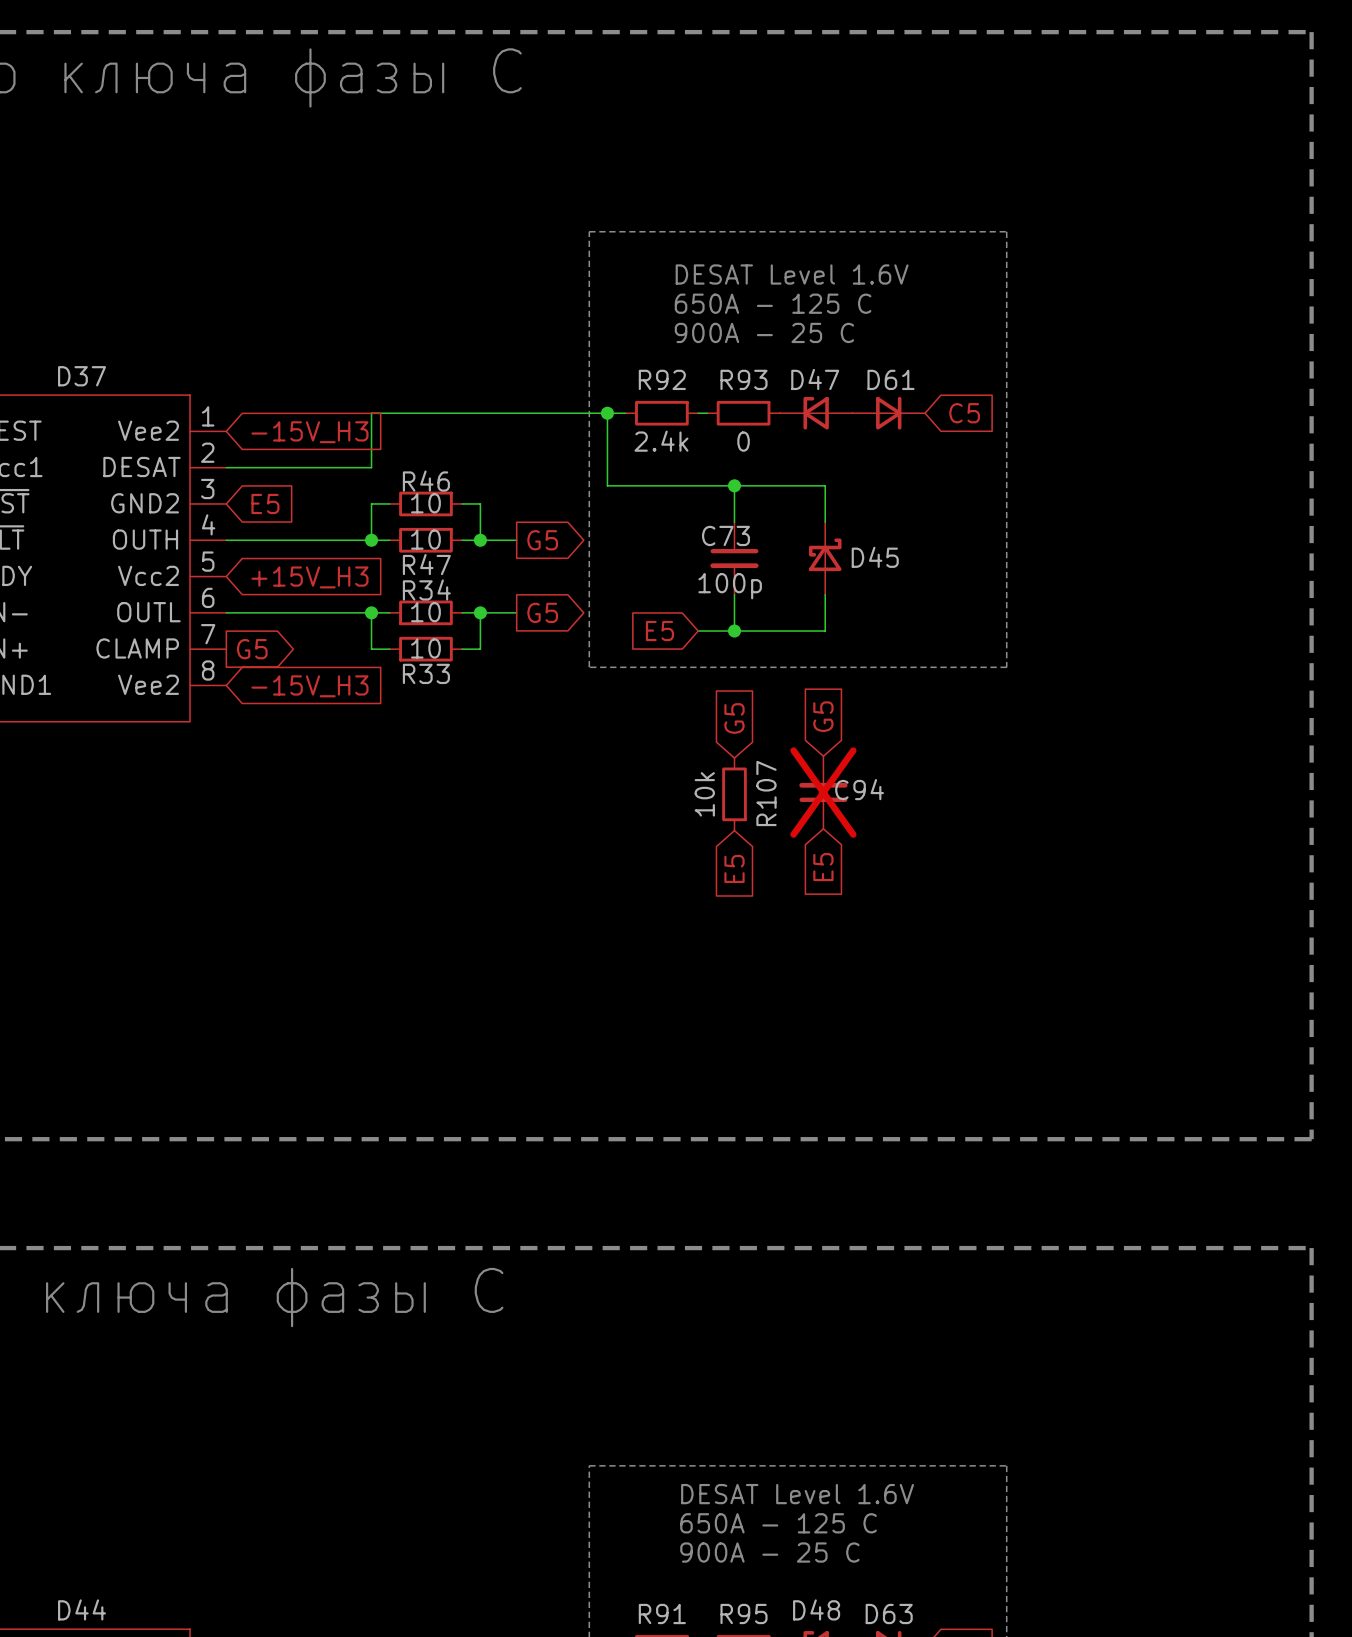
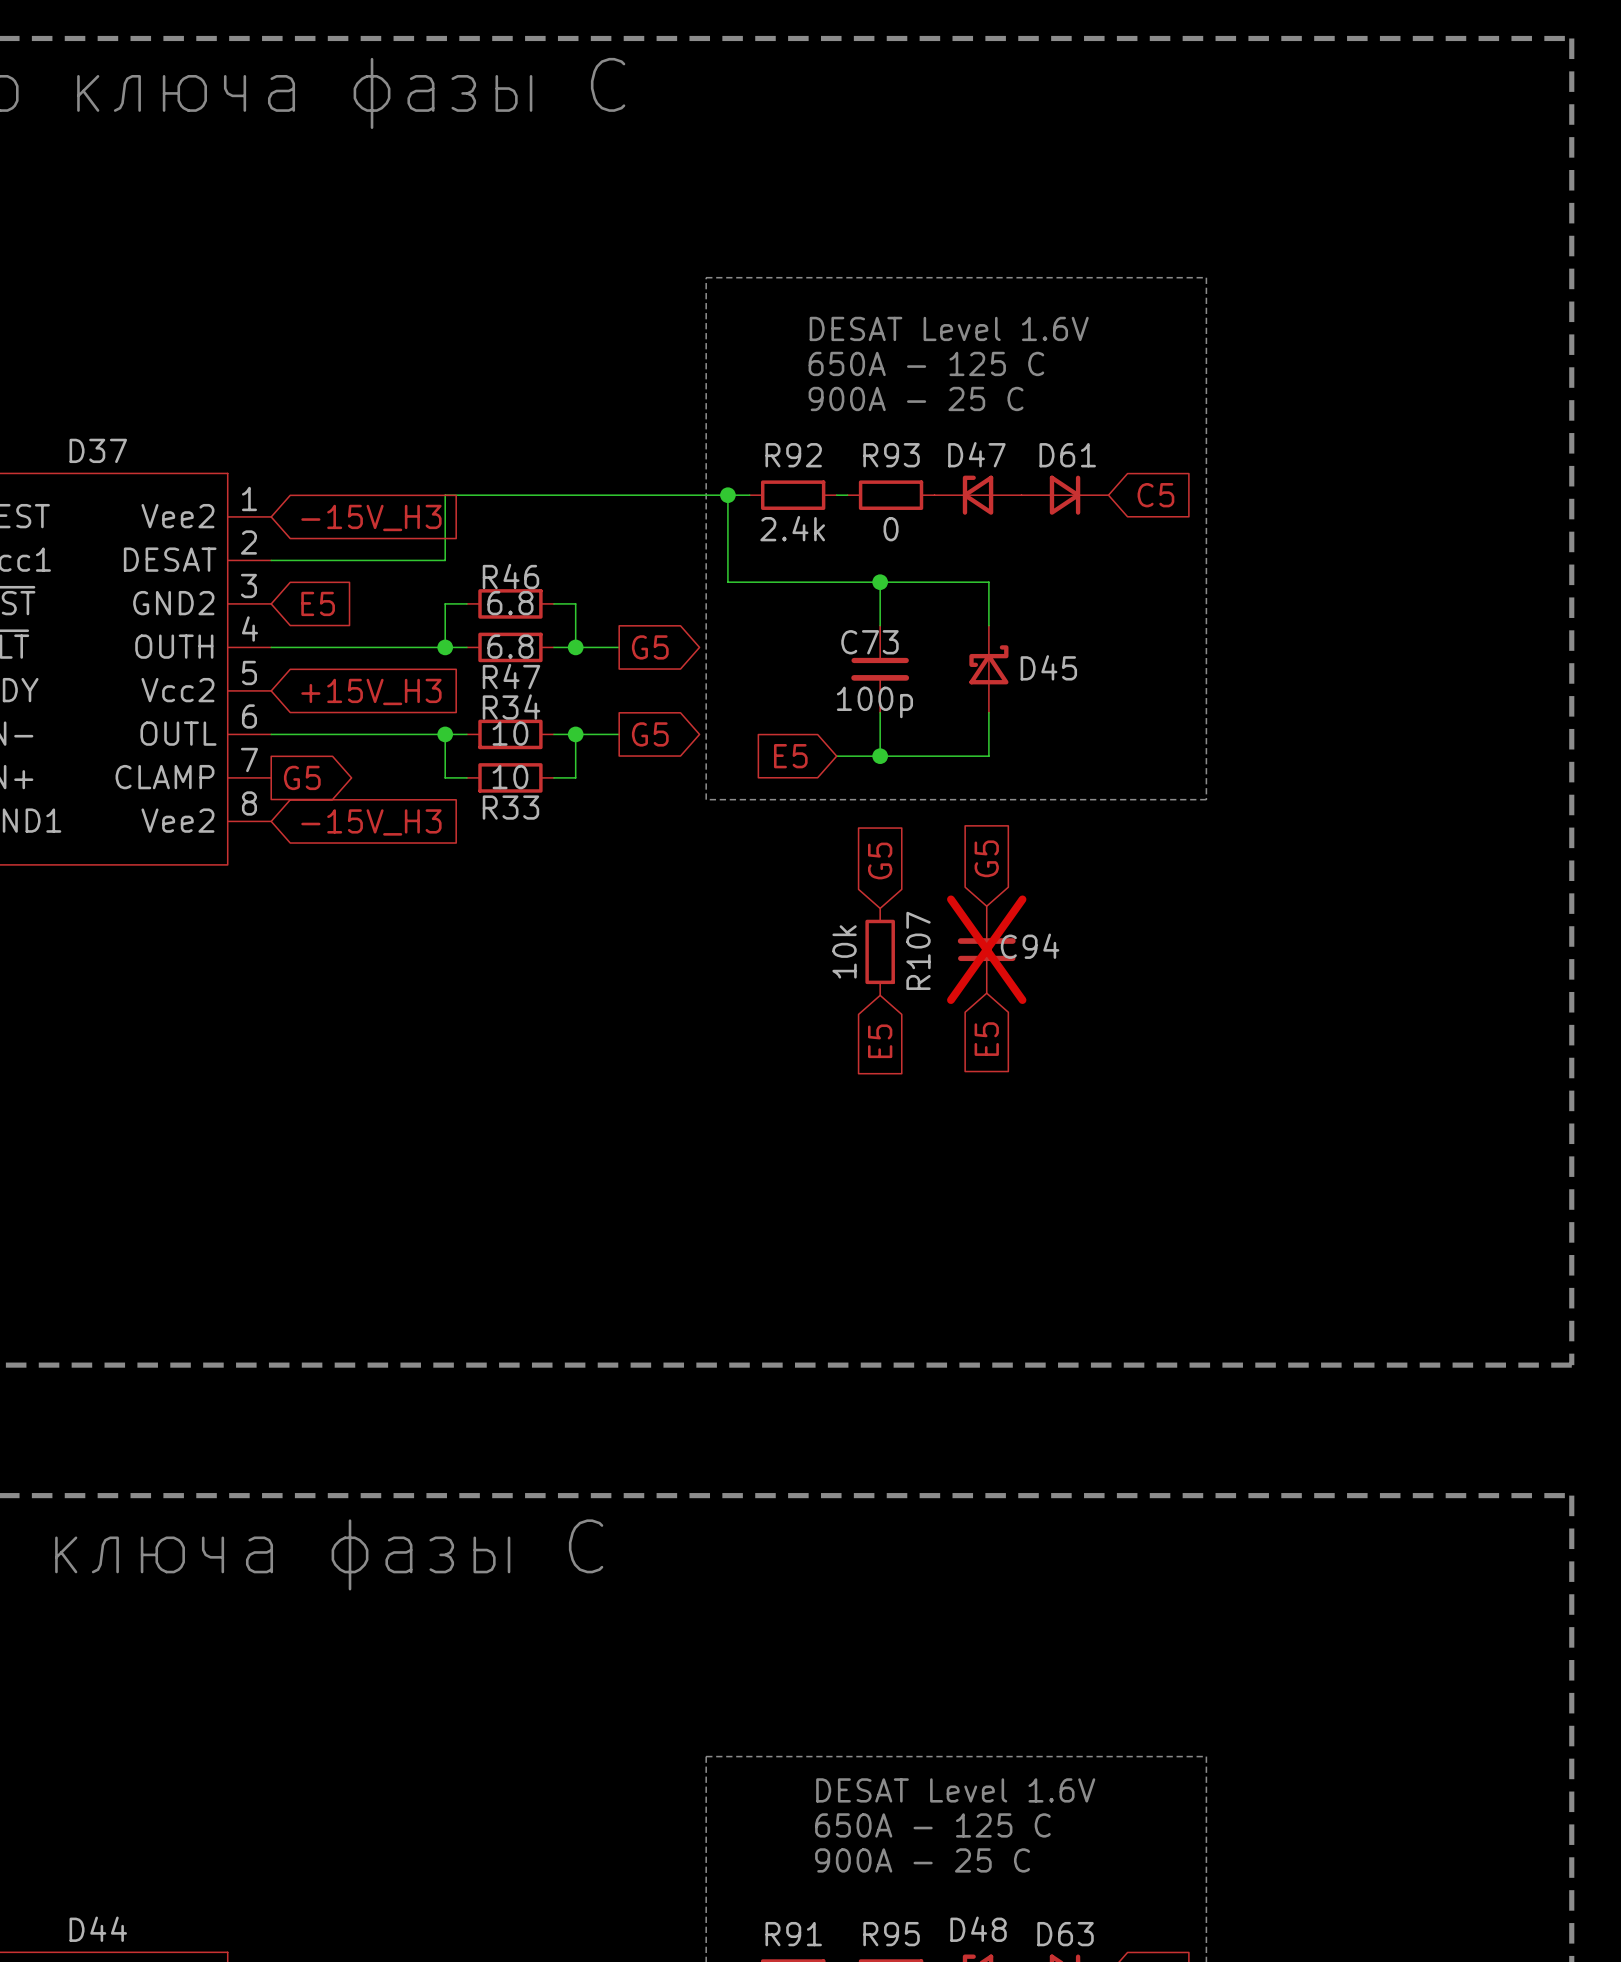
R46 value: 10 (425, 503) -> 6.8 (510, 603)
R47 value: 10 (425, 539) -> 6.8 (510, 646)

